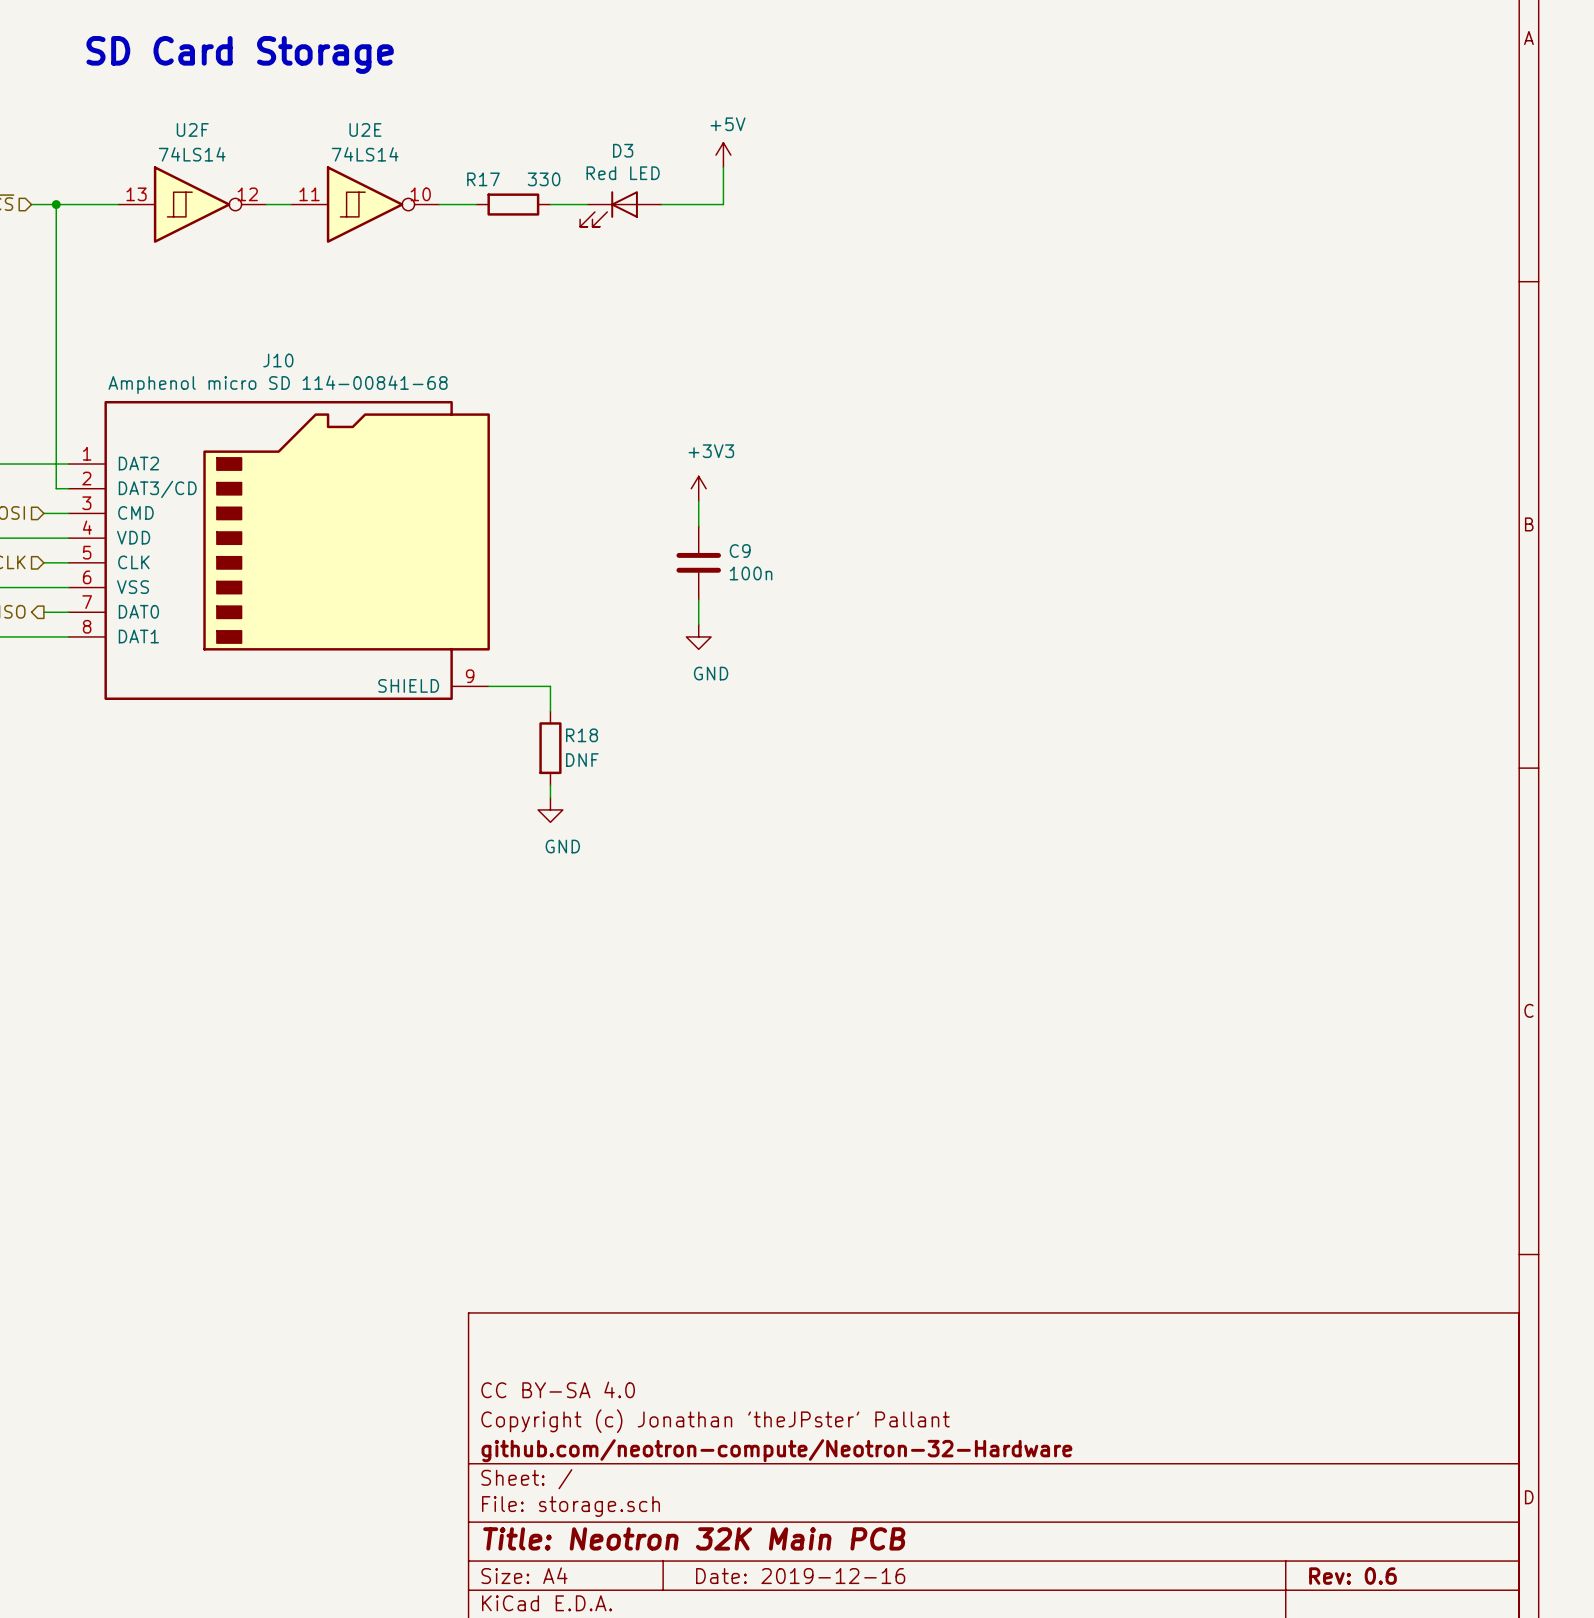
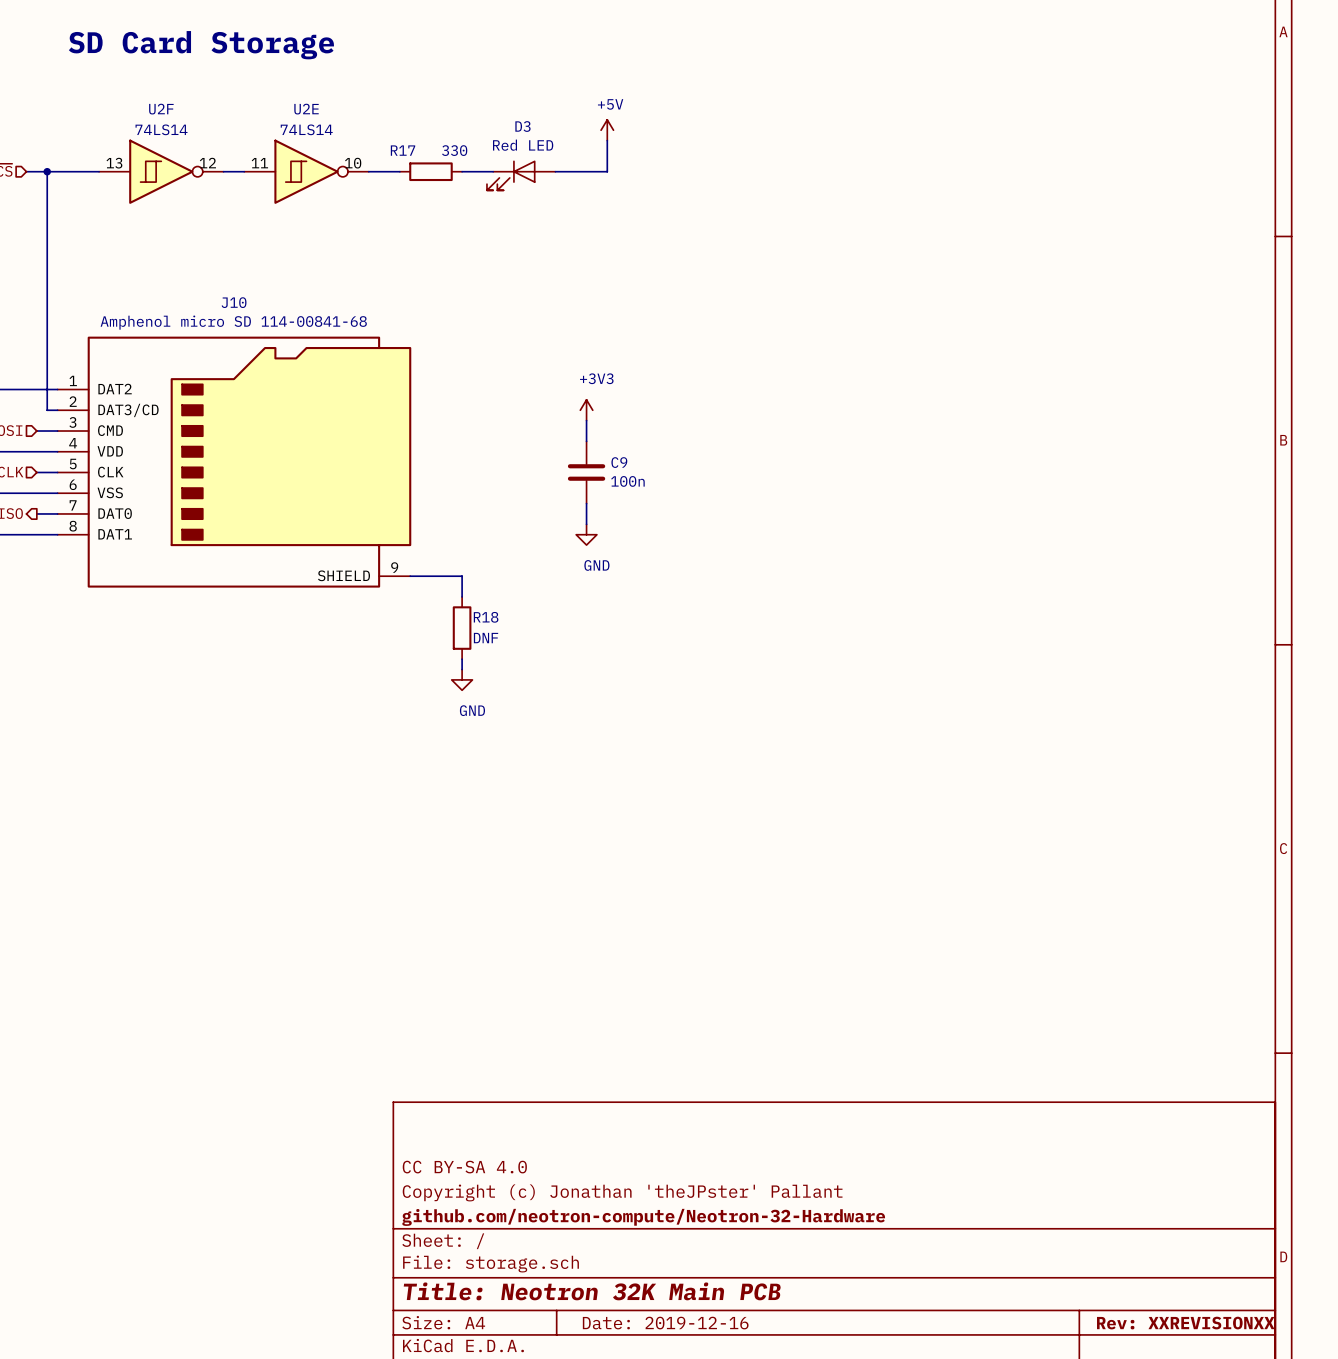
title block: Rev: 0.6 (1352, 1576) -> Rev: XXREVISIONXX (1185, 1323)

